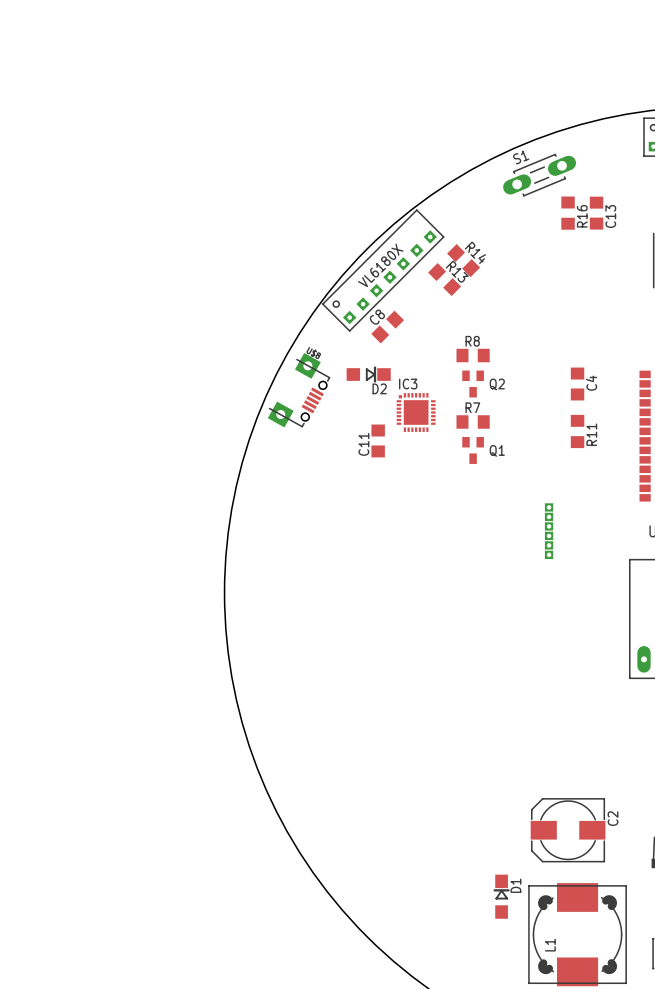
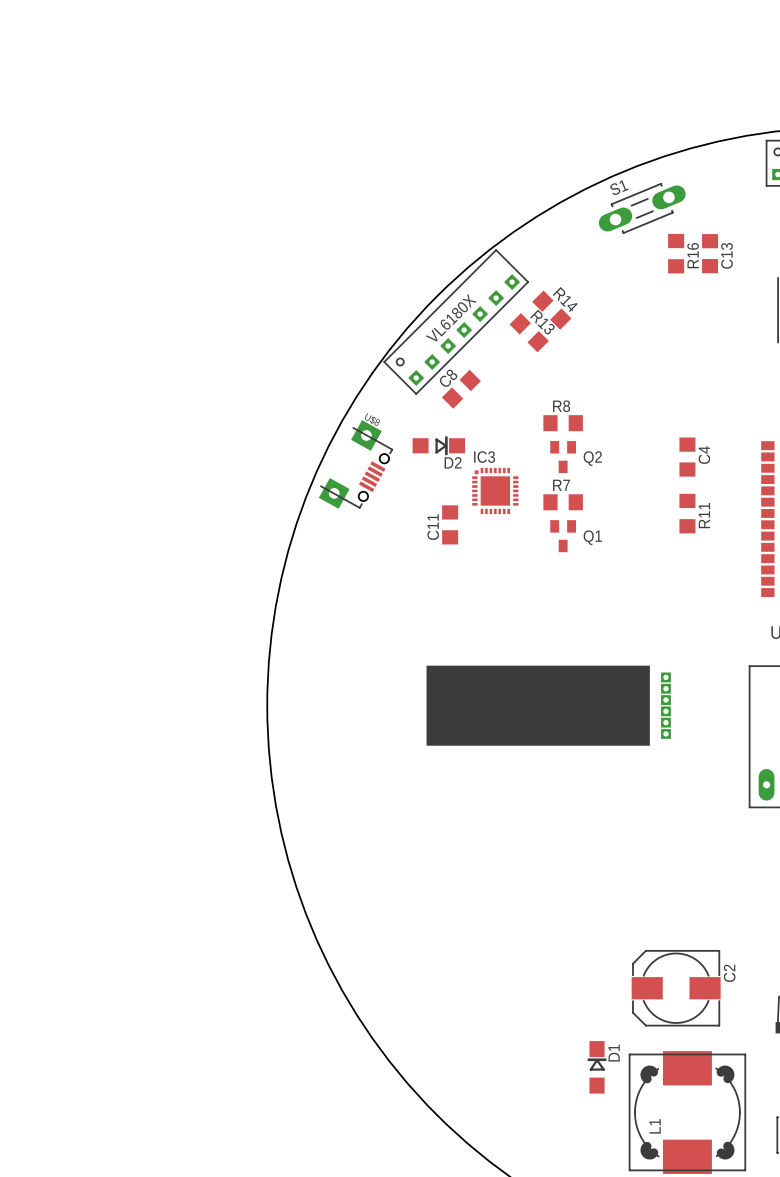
part position: (549, 531) -> (665, 705)
drawing: none -> [426, 665, 650, 746]

